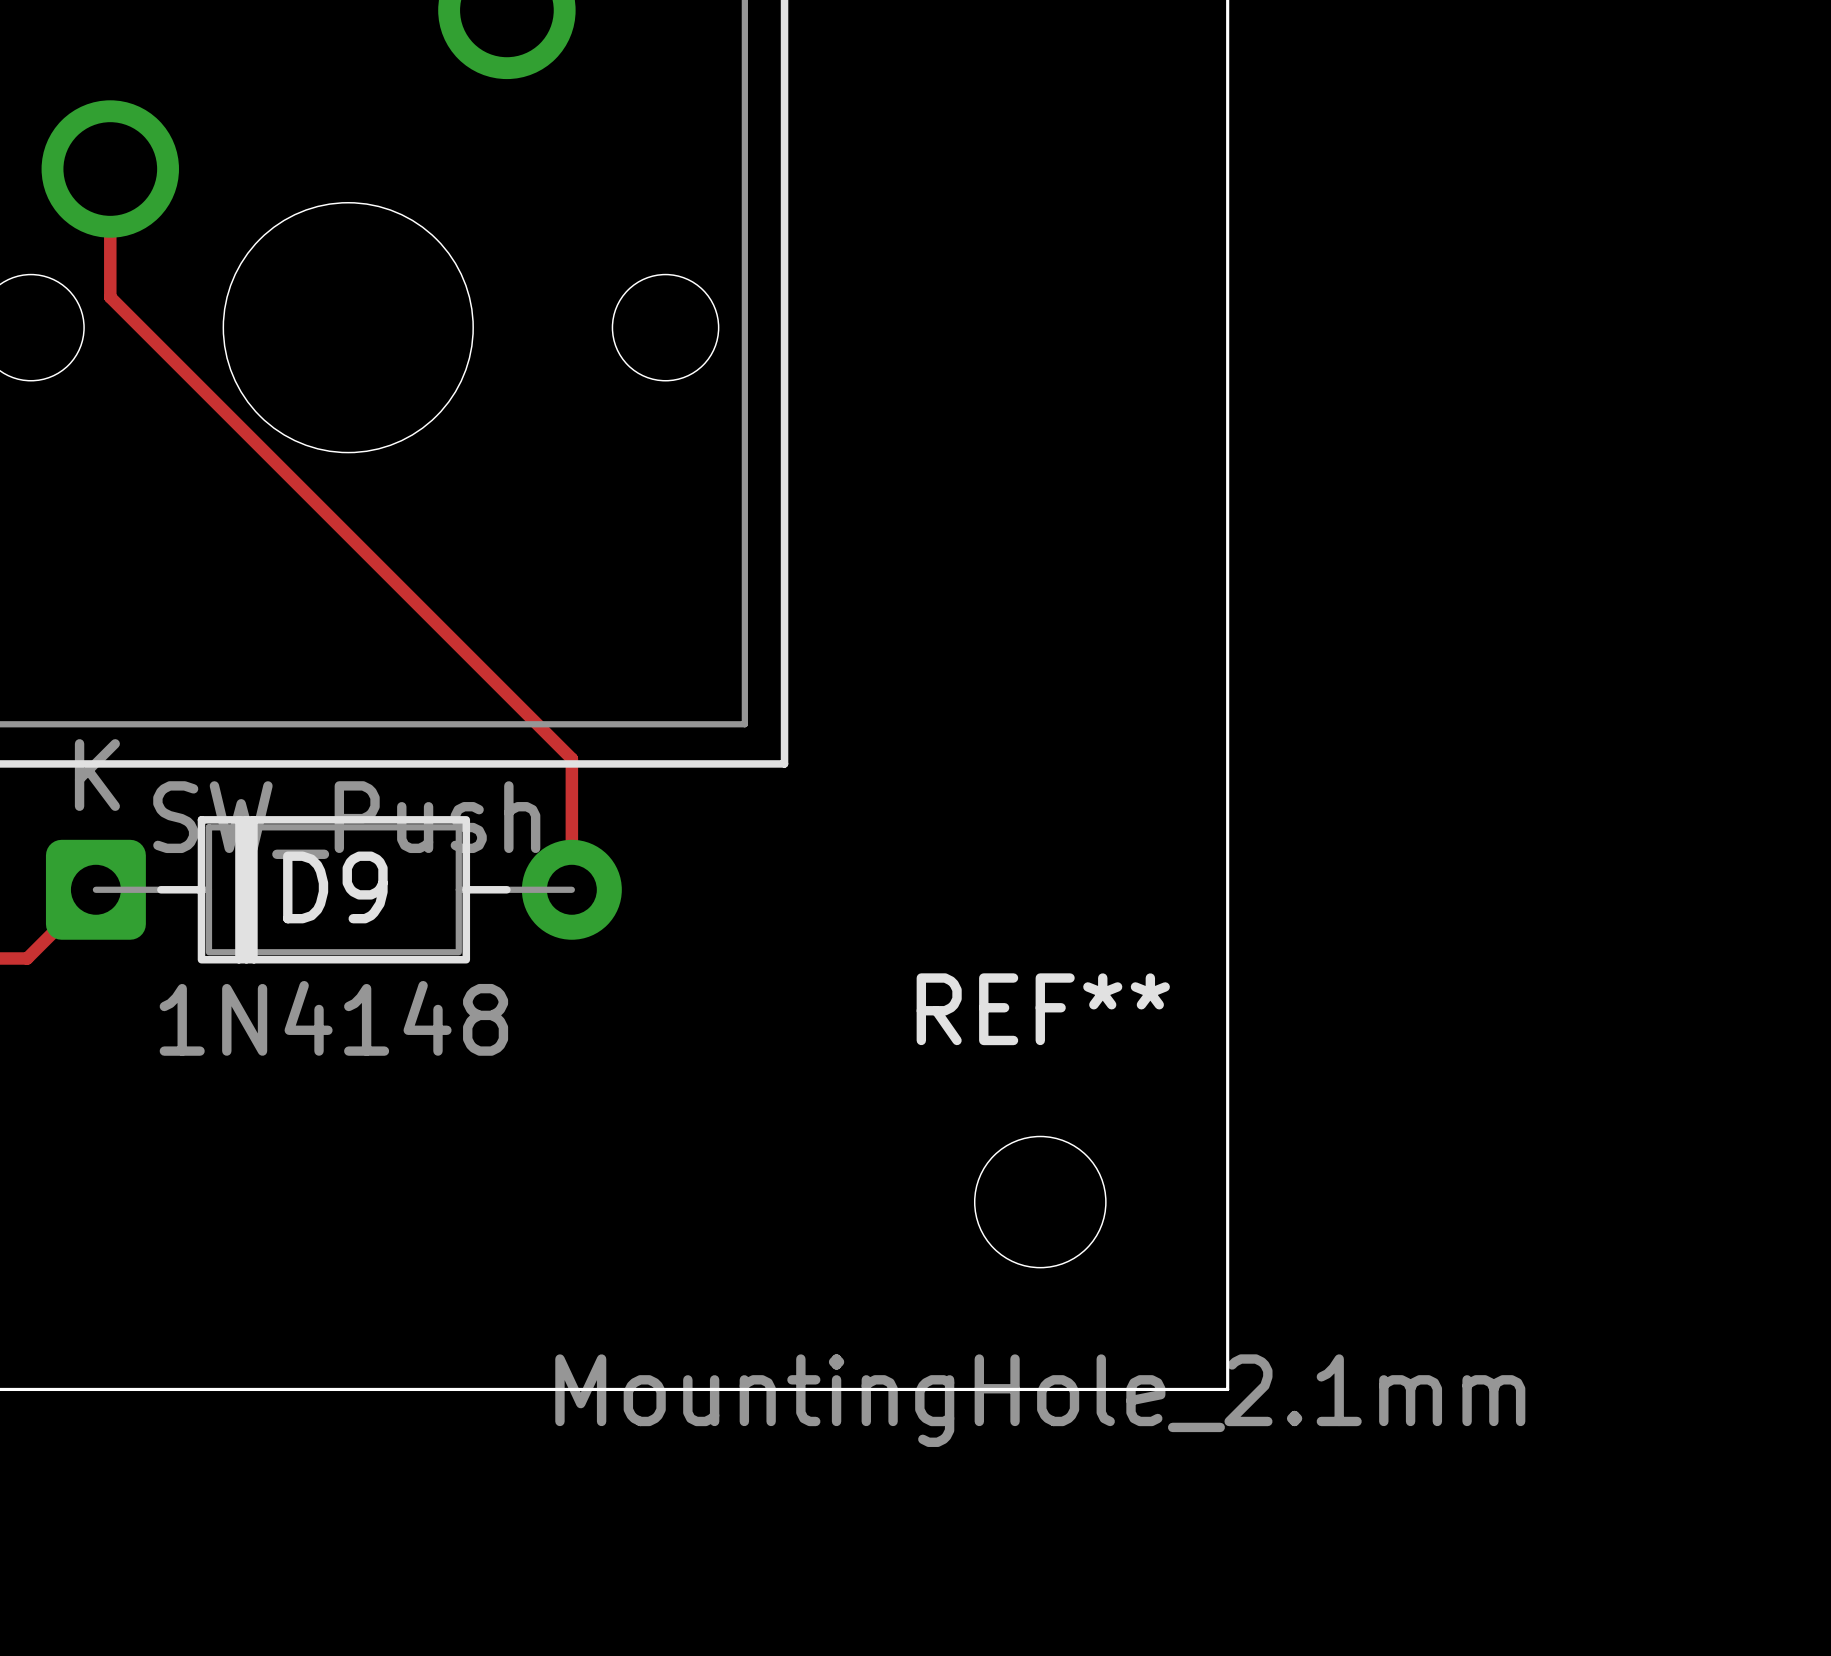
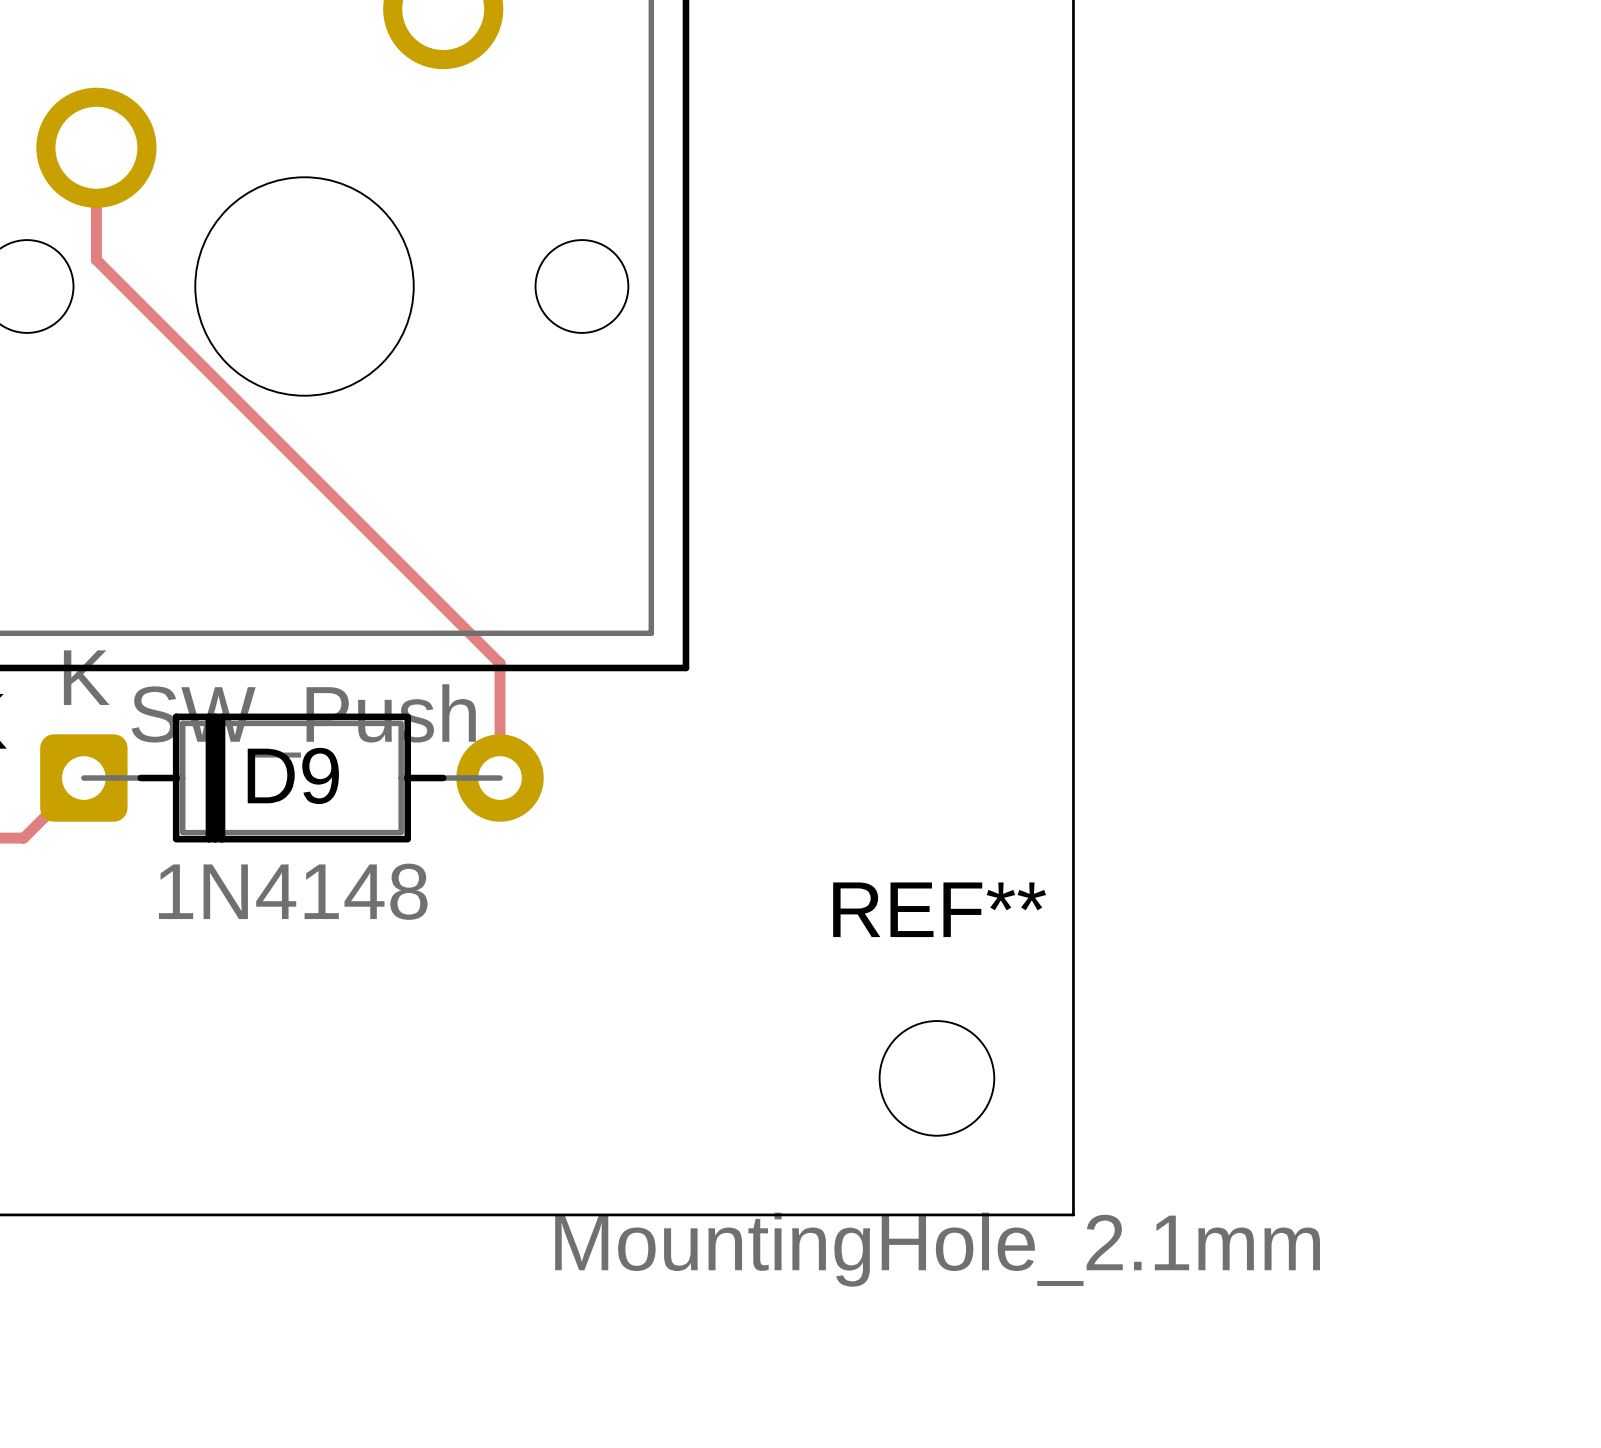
REF** position: (1040, 1202) -> (936, 1078)

